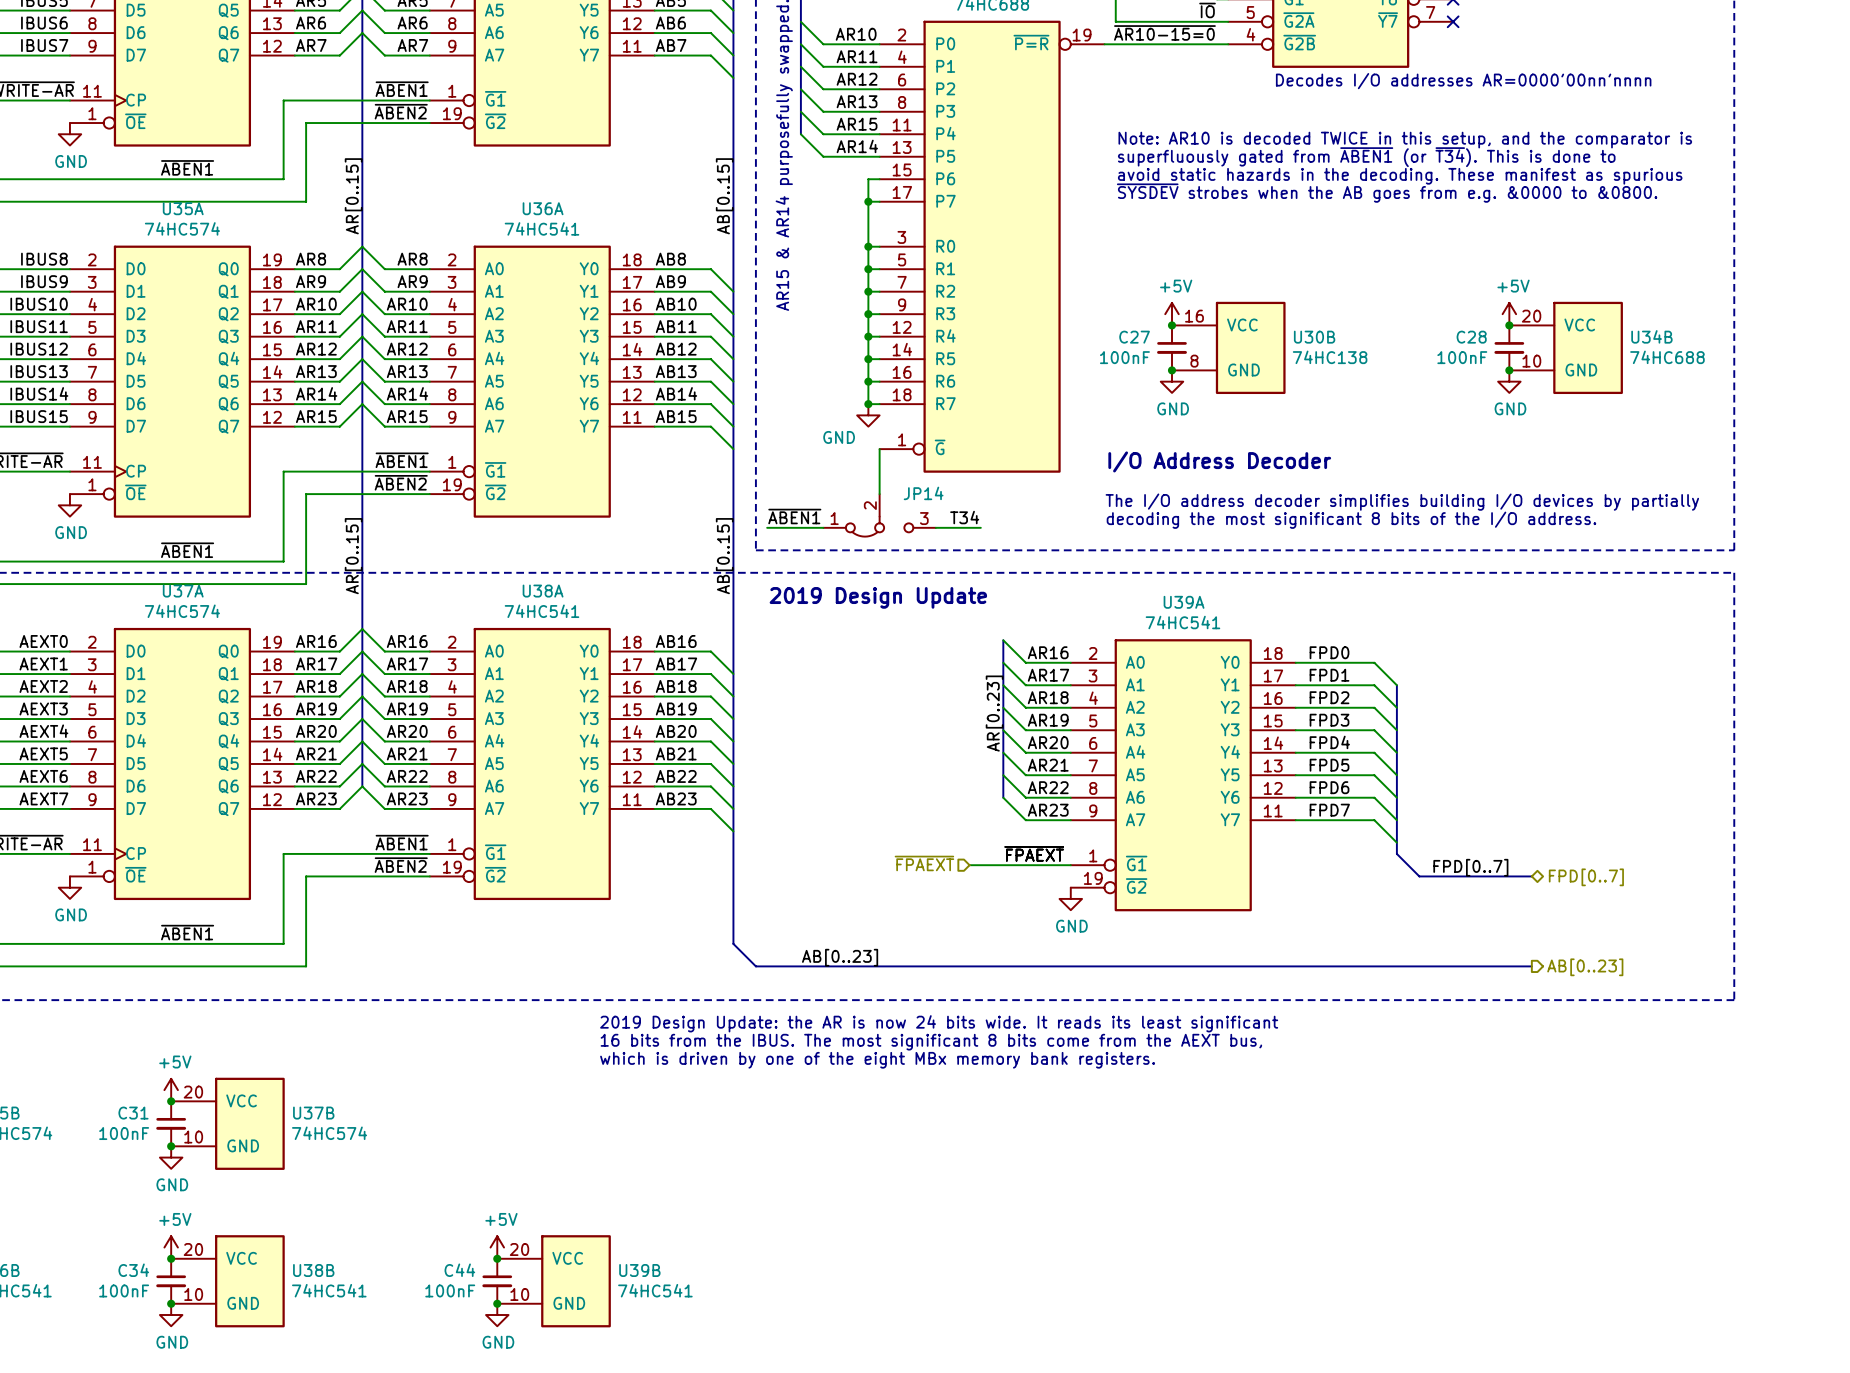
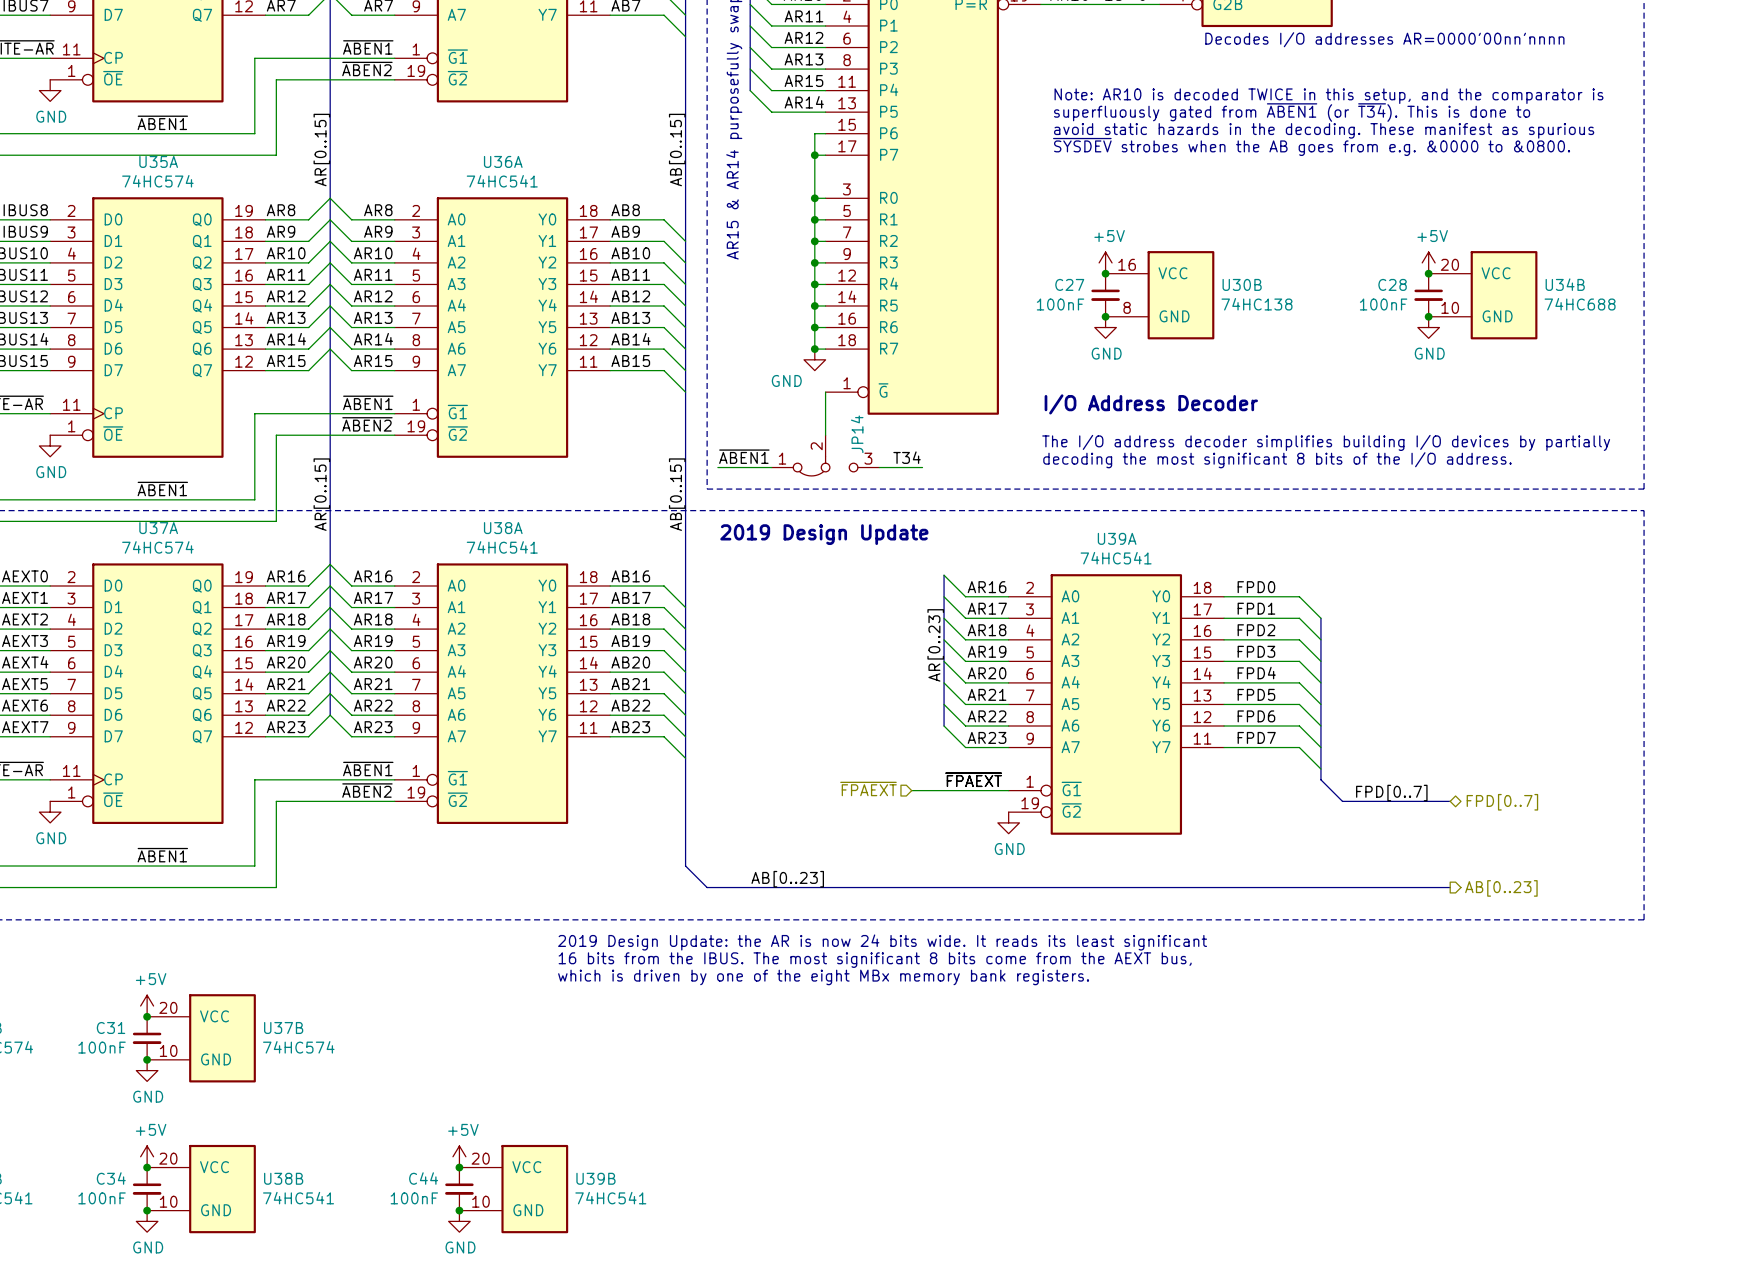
JP14 name rotation: 0° (923, 493) -> 90° counterclockwise (857, 434)

